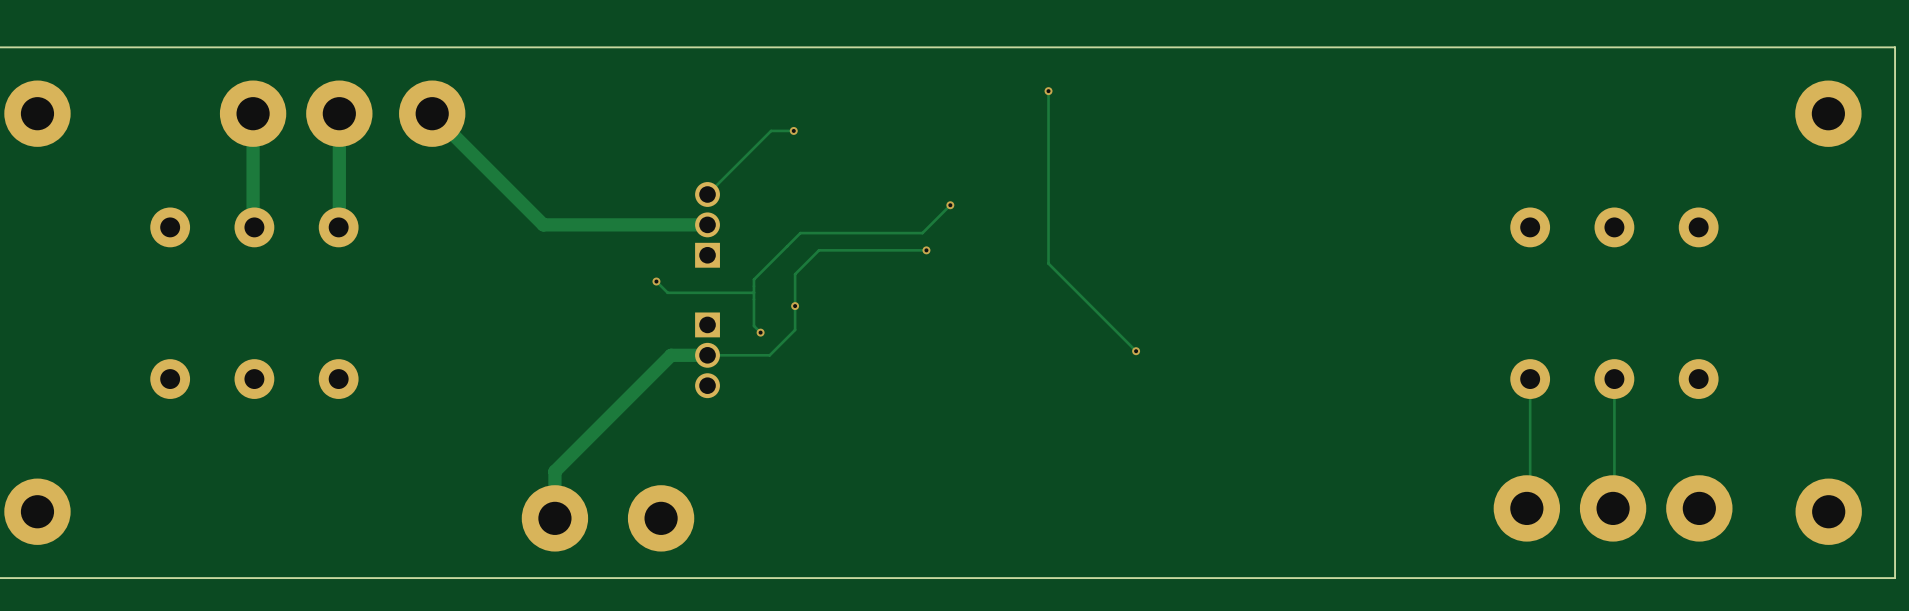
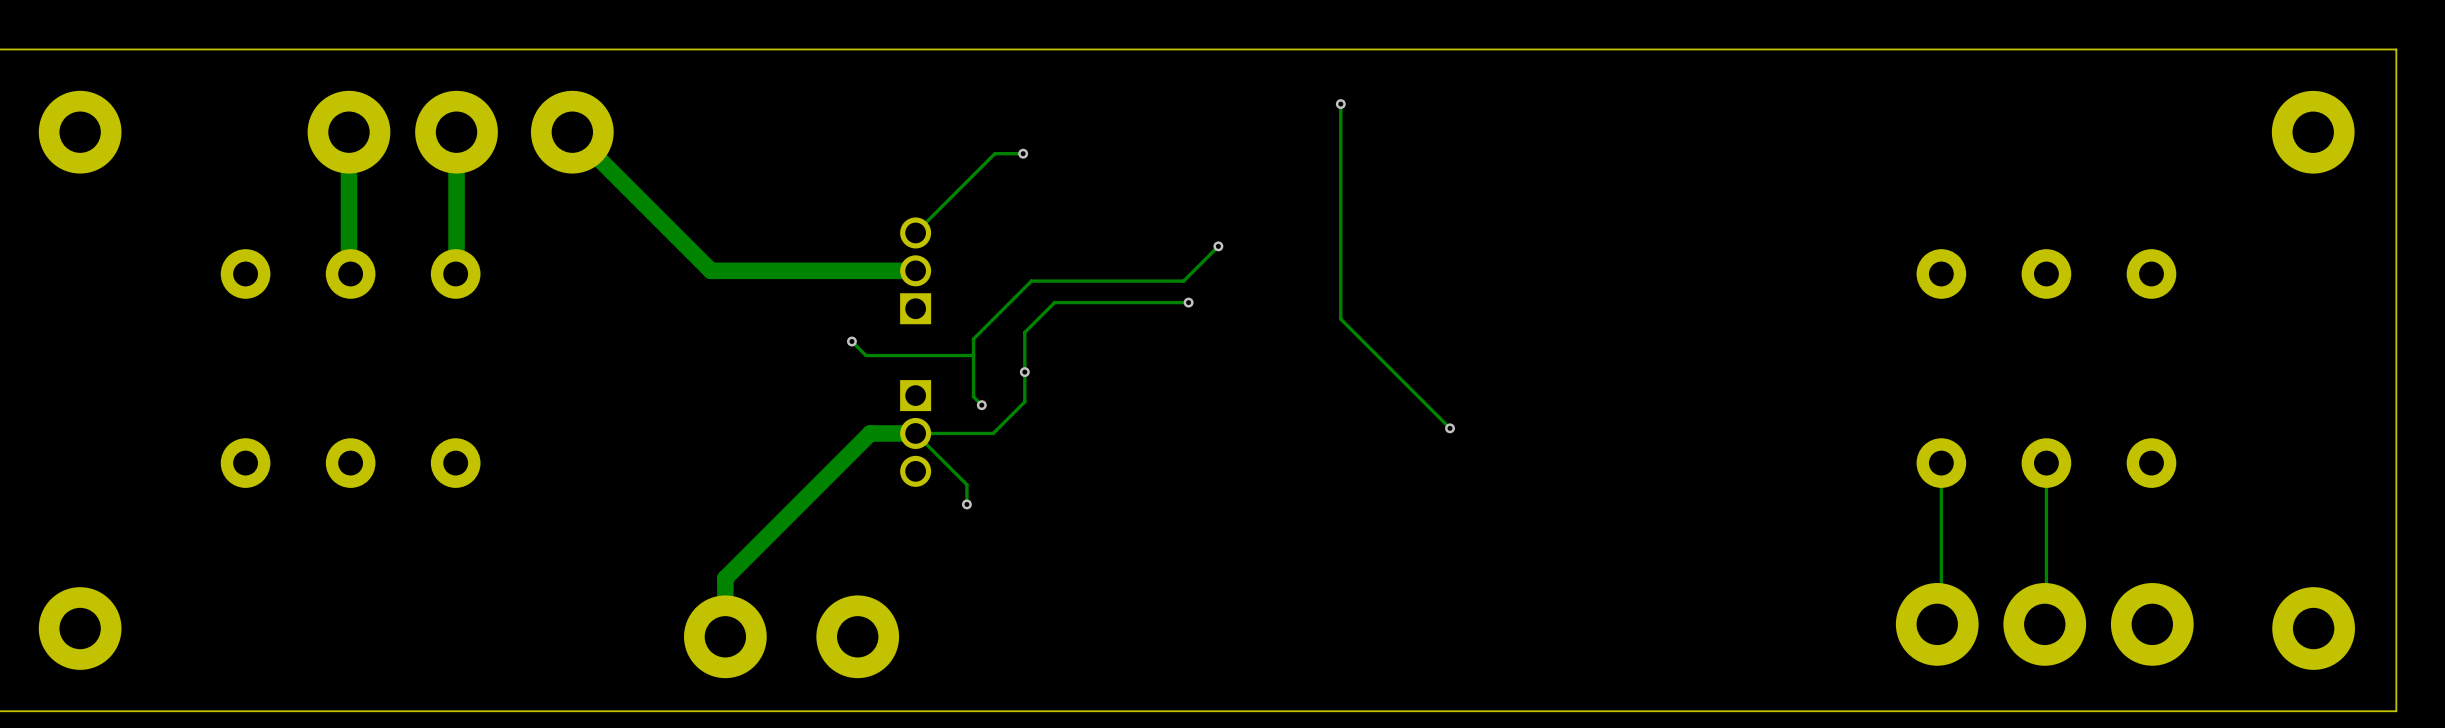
track: none -> (915, 433) (966, 484) (966, 504)
via: none -> (966, 504)

